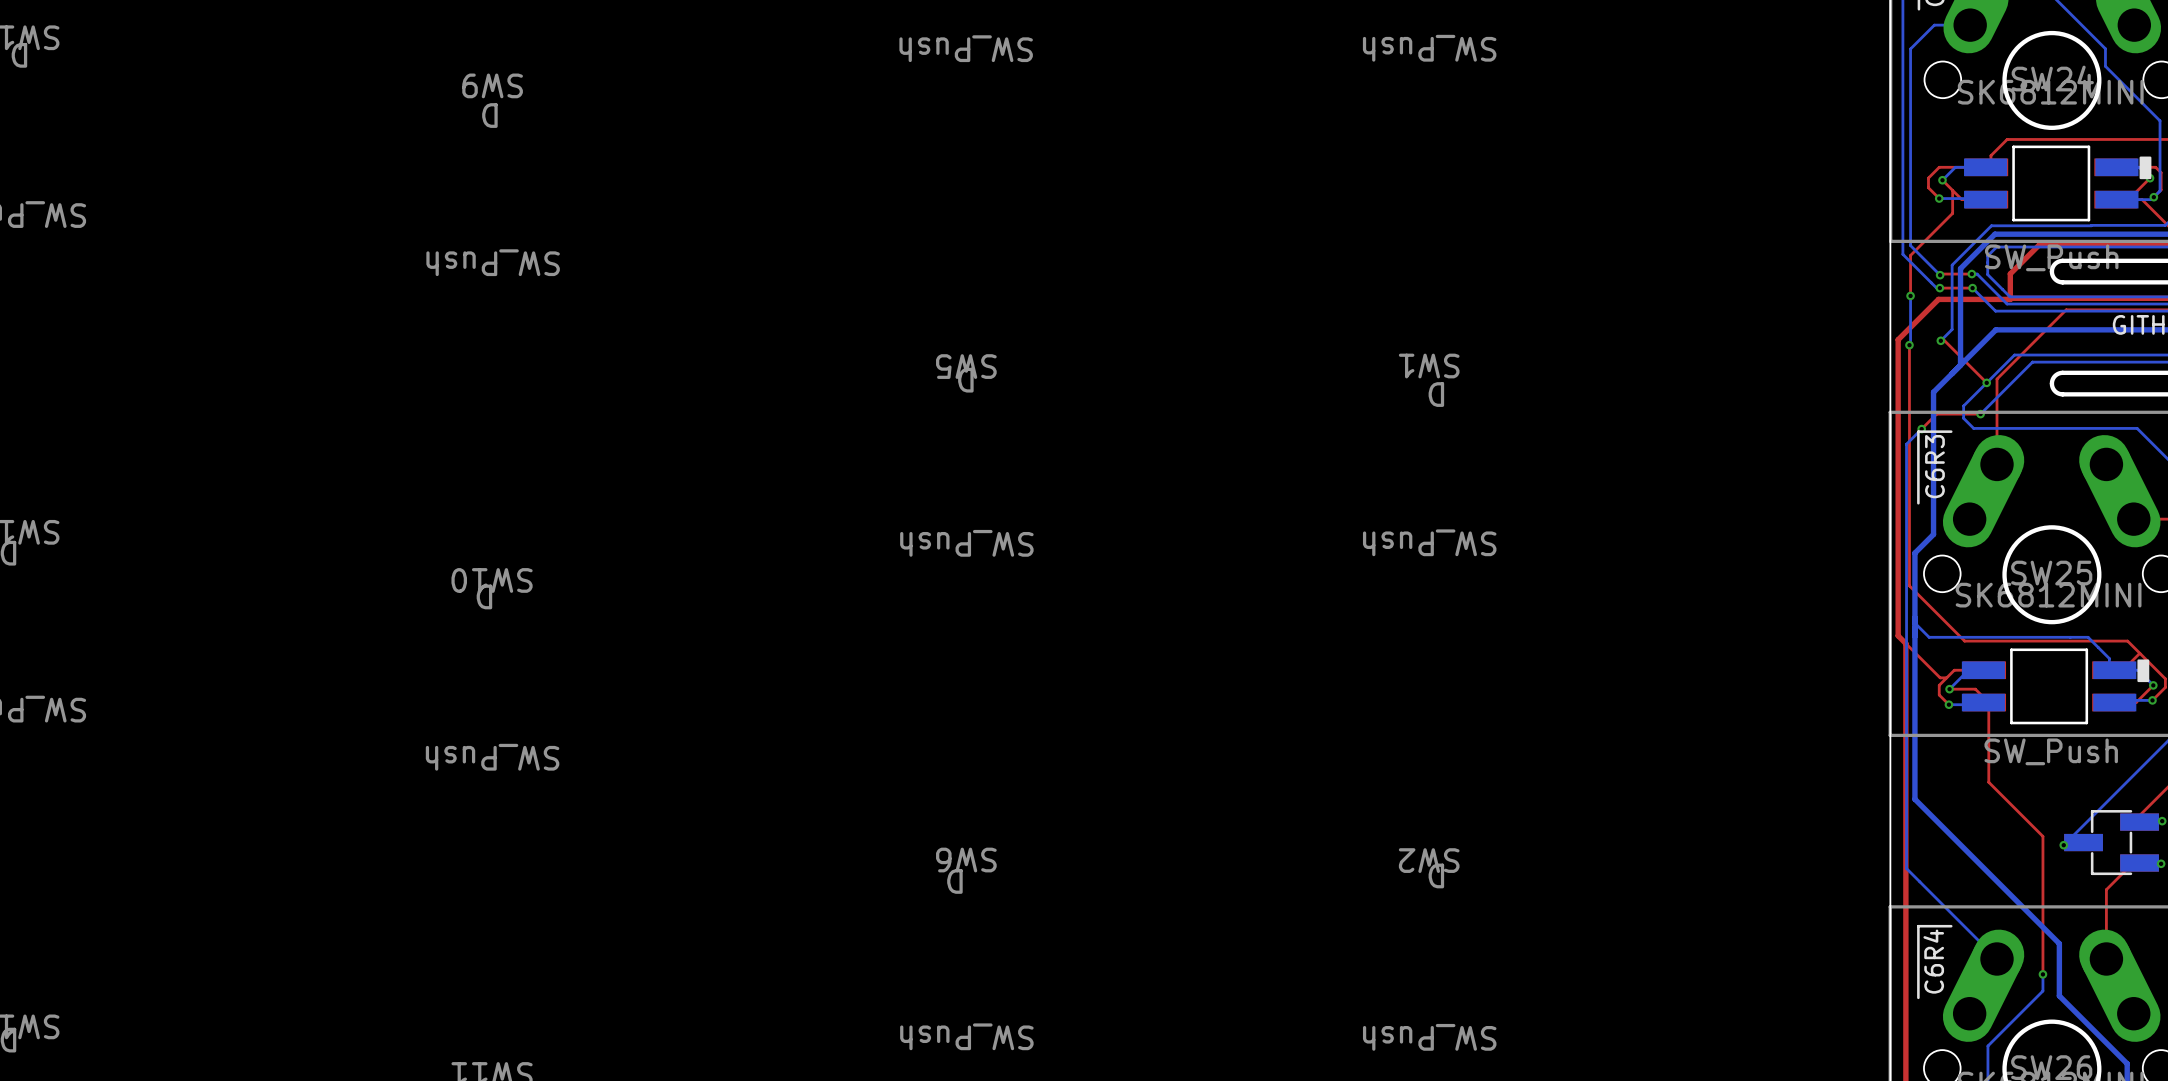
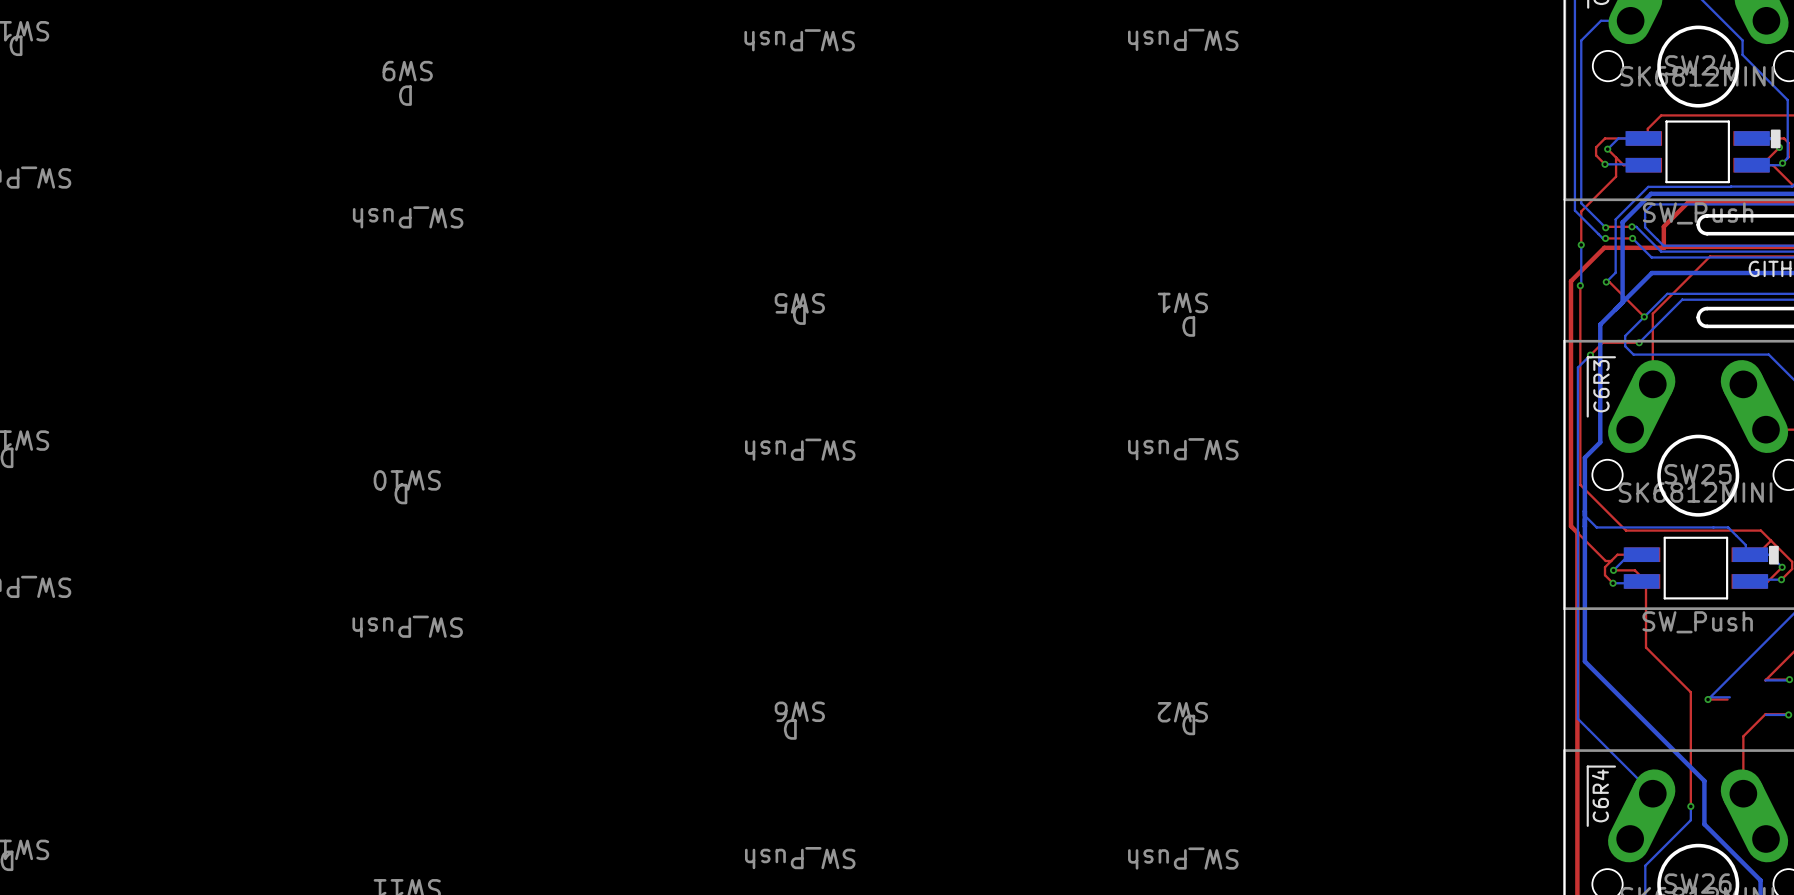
part: (2111, 842) -> none

